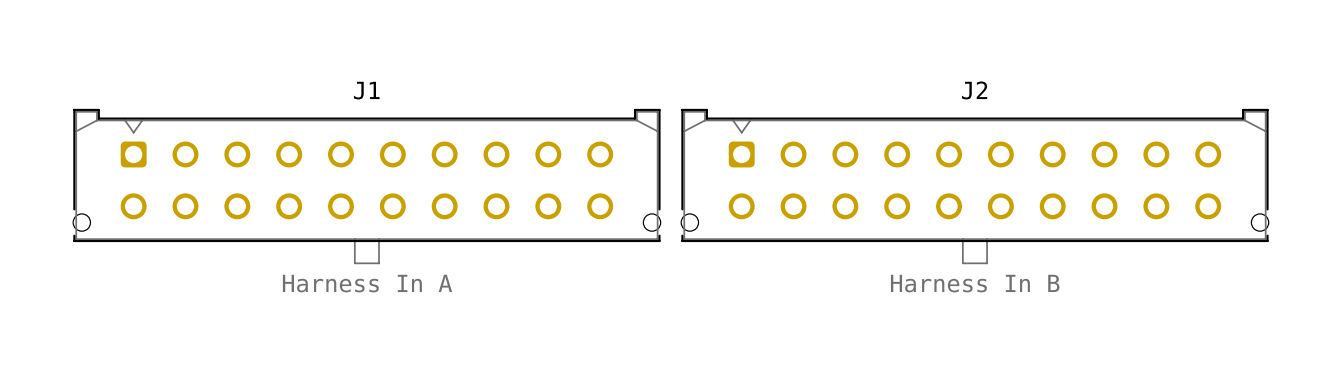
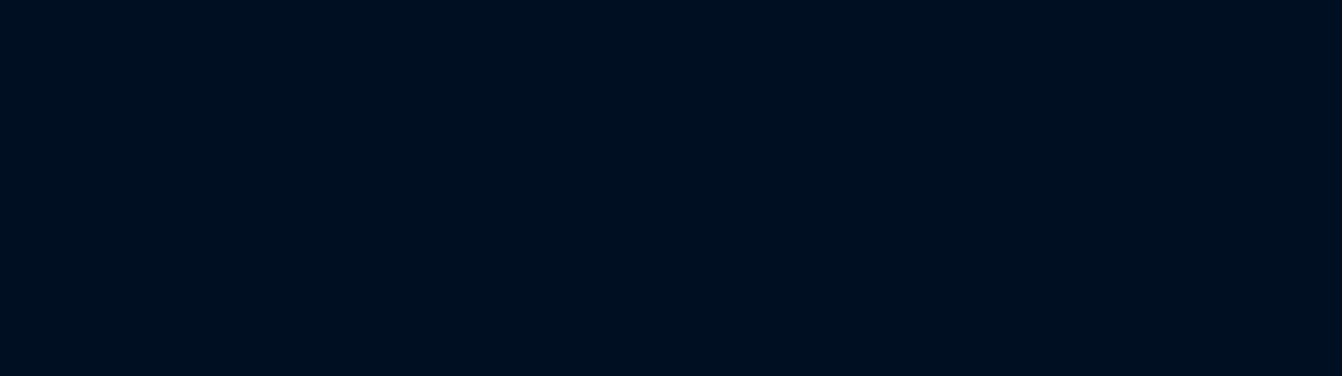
J1: Harness In A (366, 186) -> none
J2: Harness In B (974, 186) -> none

